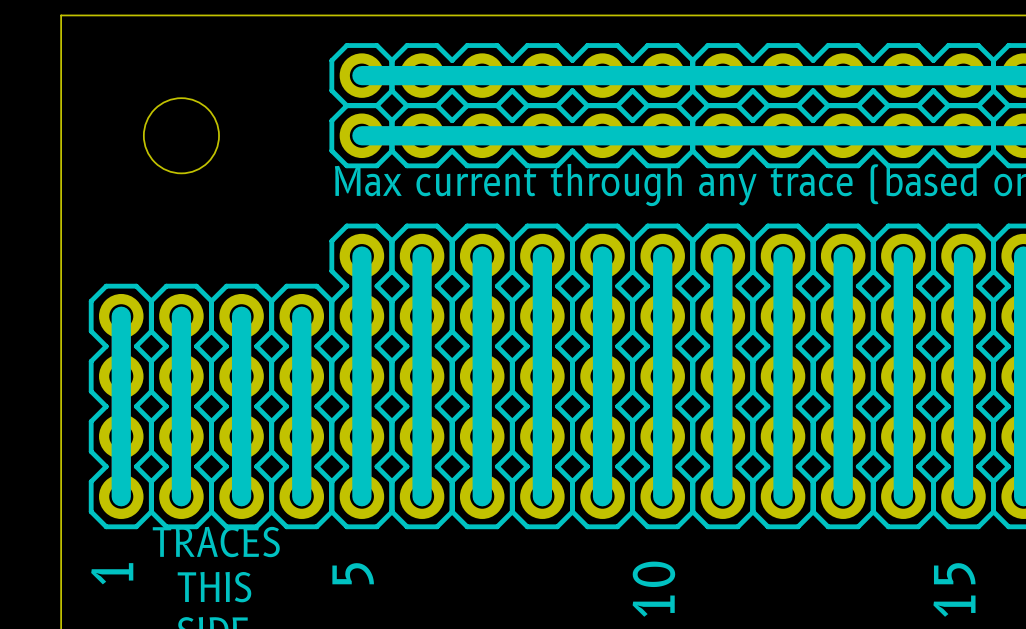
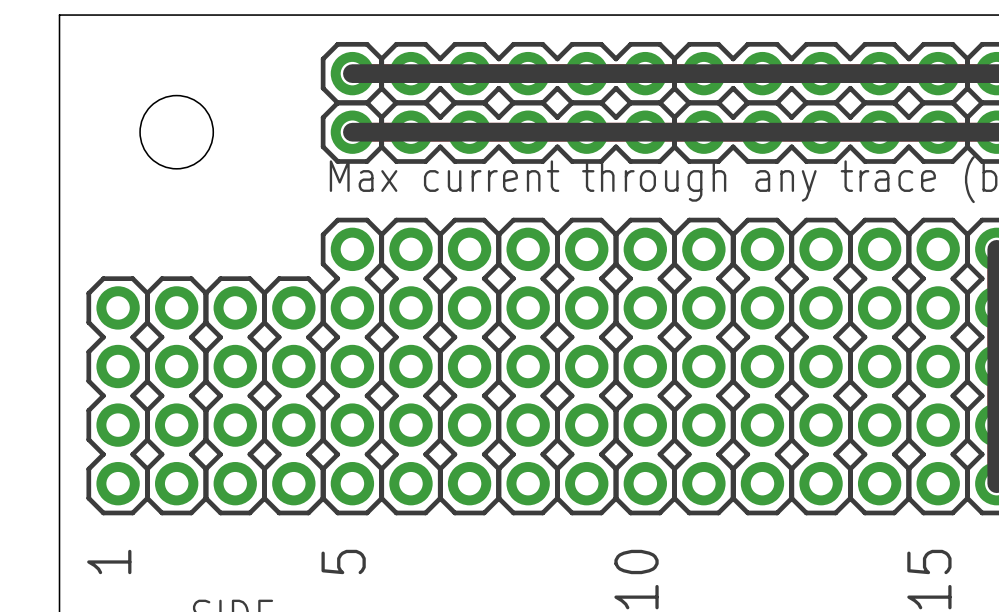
line: (361, 256) (361, 496) -> none
line: (422, 256) (422, 496) -> none
line: (482, 256) (482, 496) -> none
line: (542, 256) (542, 496) -> none
line: (602, 256) (602, 496) -> none
line: (662, 256) (662, 496) -> none
line: (722, 256) (722, 496) -> none
line: (783, 256) (783, 496) -> none
line: (843, 256) (843, 496) -> none
line: (903, 256) (903, 496) -> none
line: (963, 256) (963, 496) -> none
line: (121, 316) (121, 496) -> none
line: (181, 316) (181, 496) -> none
line: (241, 316) (241, 496) -> none
line: (301, 316) (301, 496) -> none
text: TRACES (216, 542) -> none
text: THIS (214, 587) -> none

